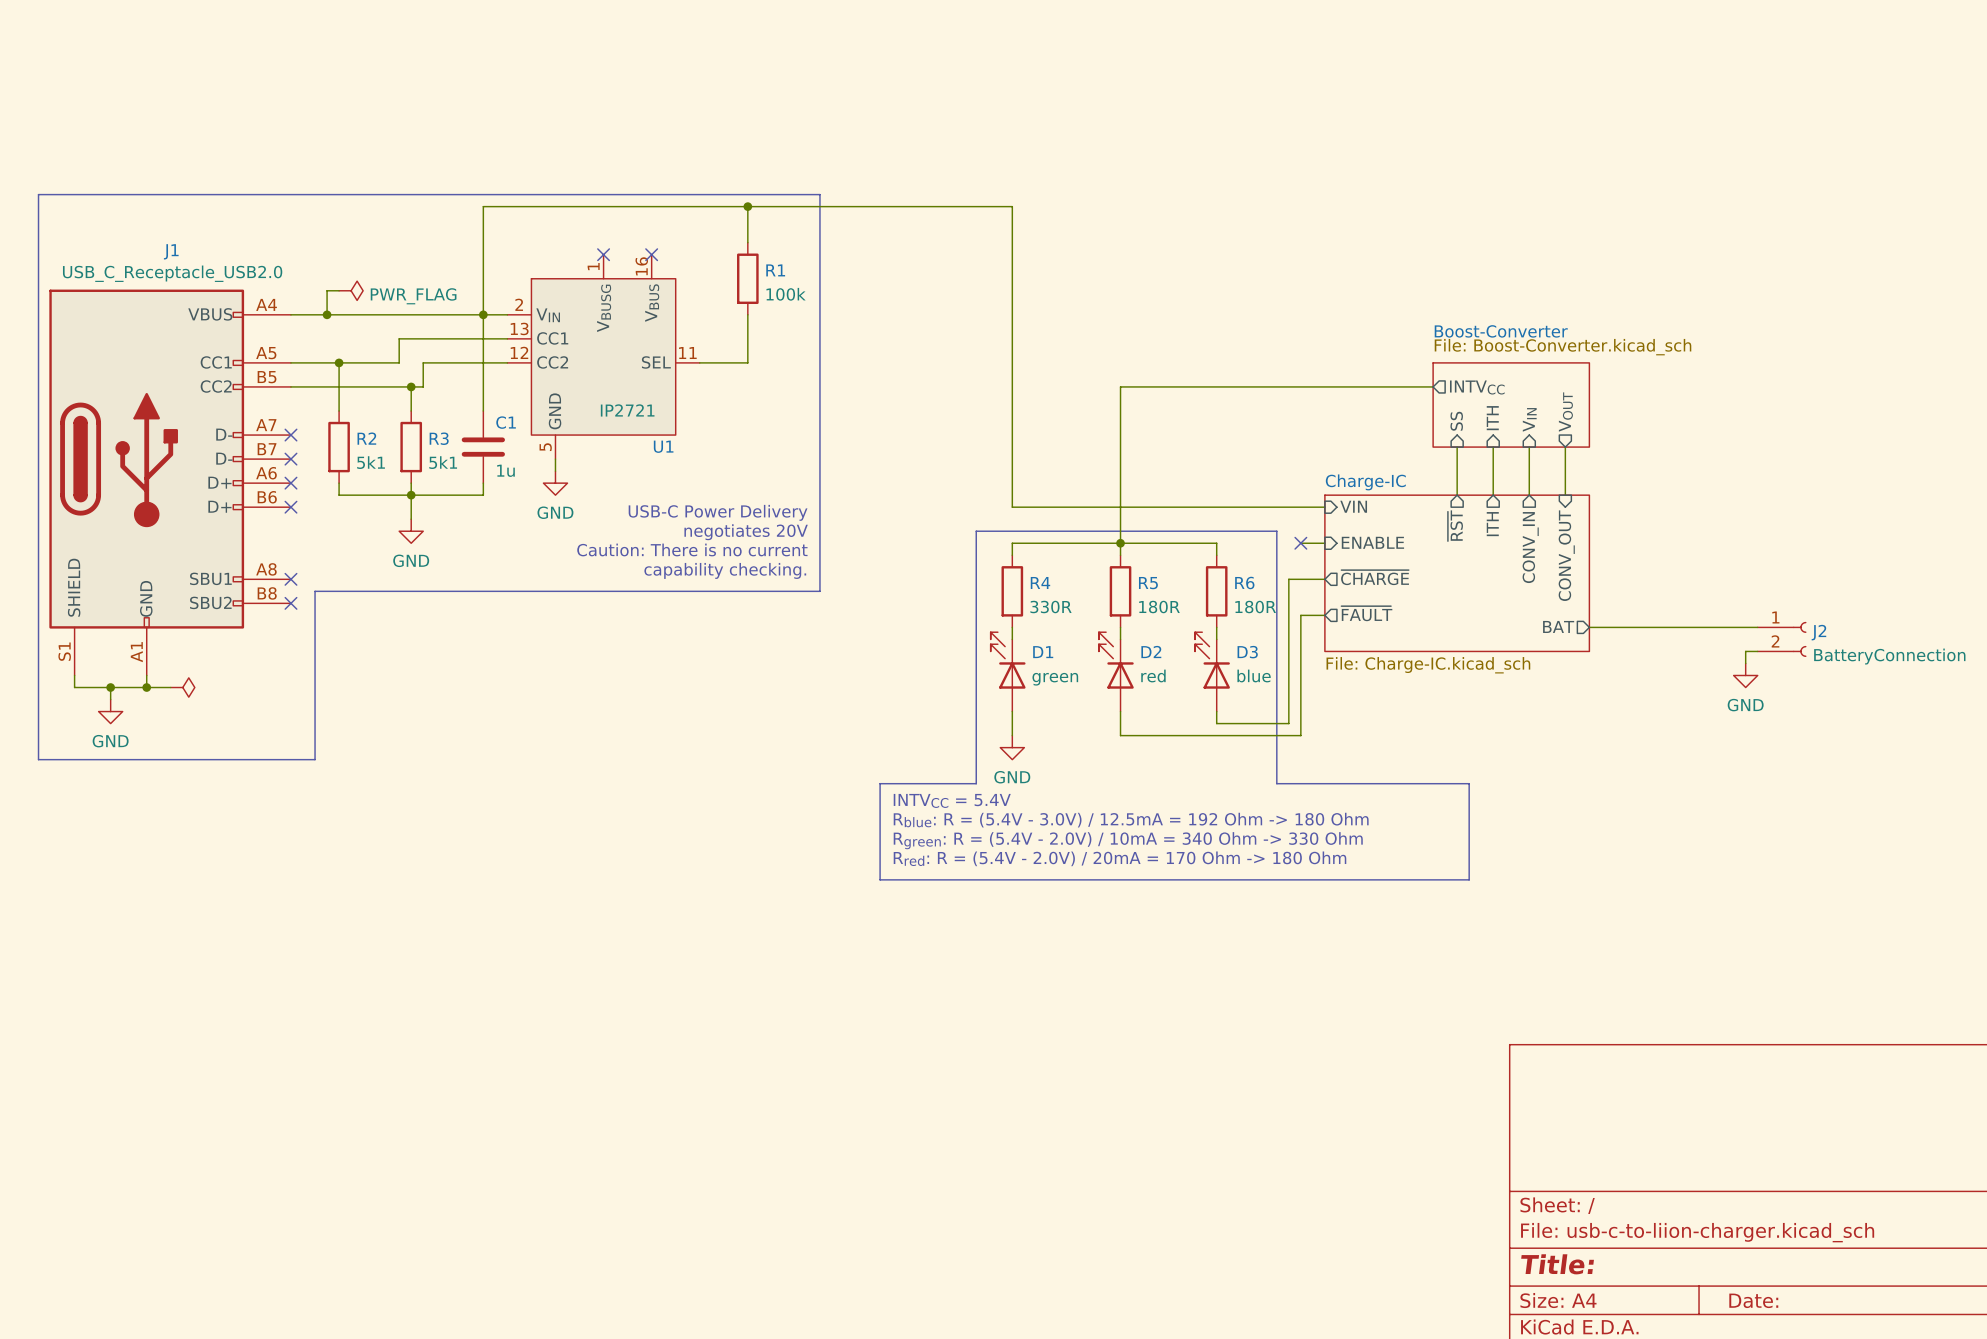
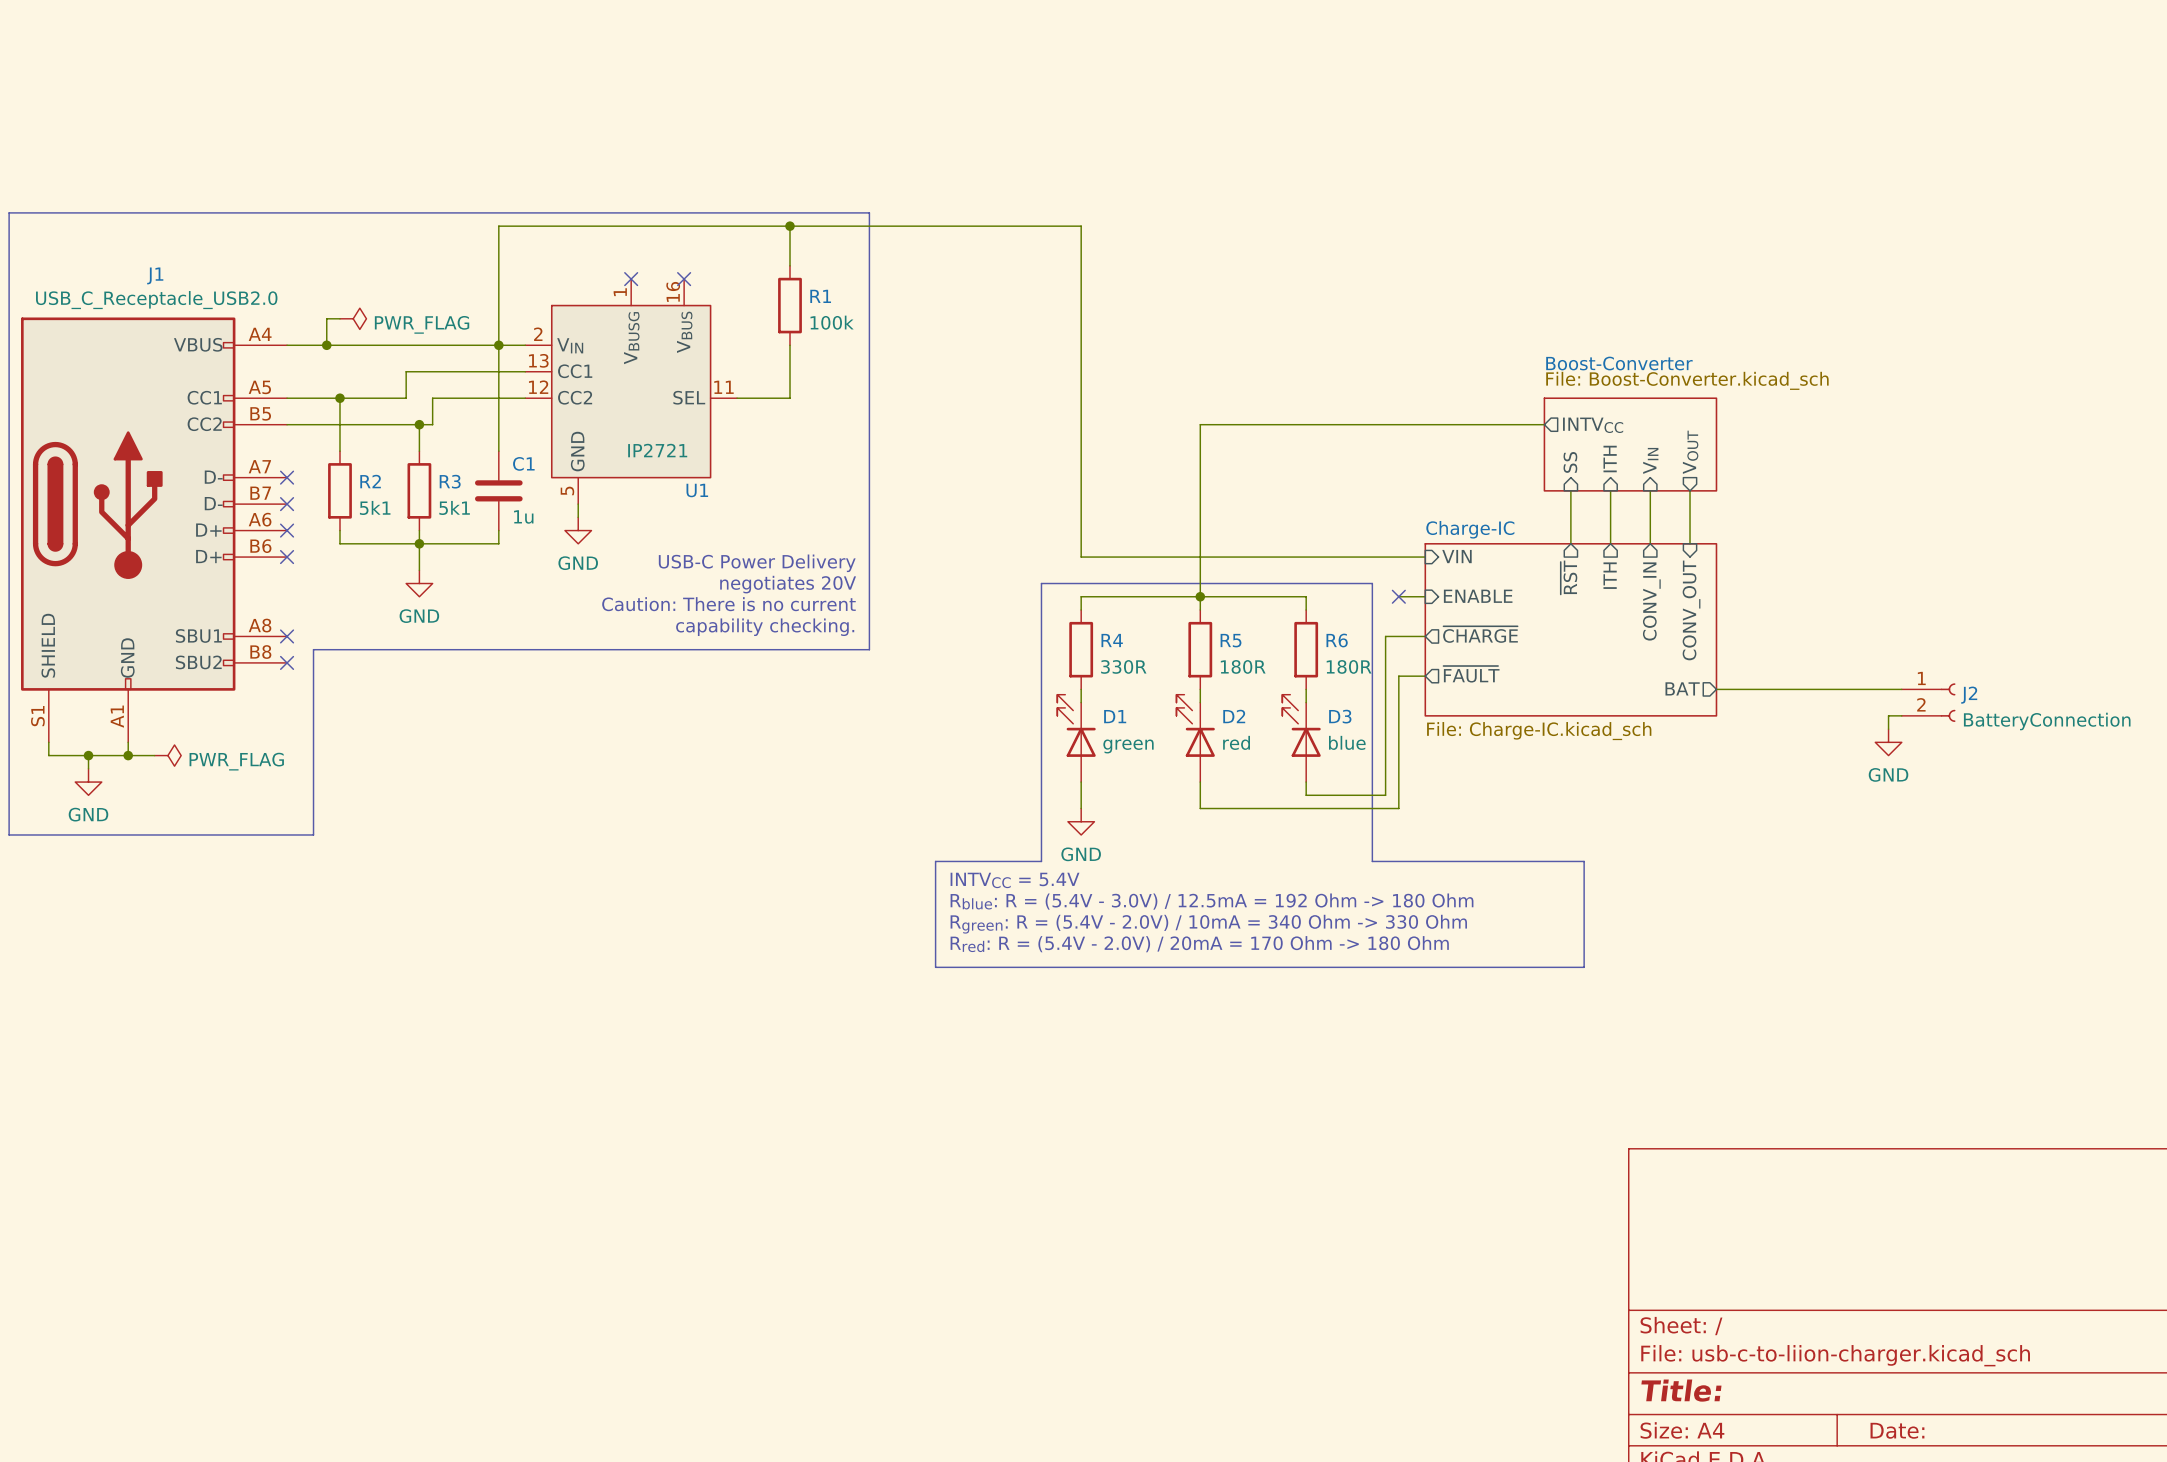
power symbol text: none -> PWR_FLAG (236, 761)

